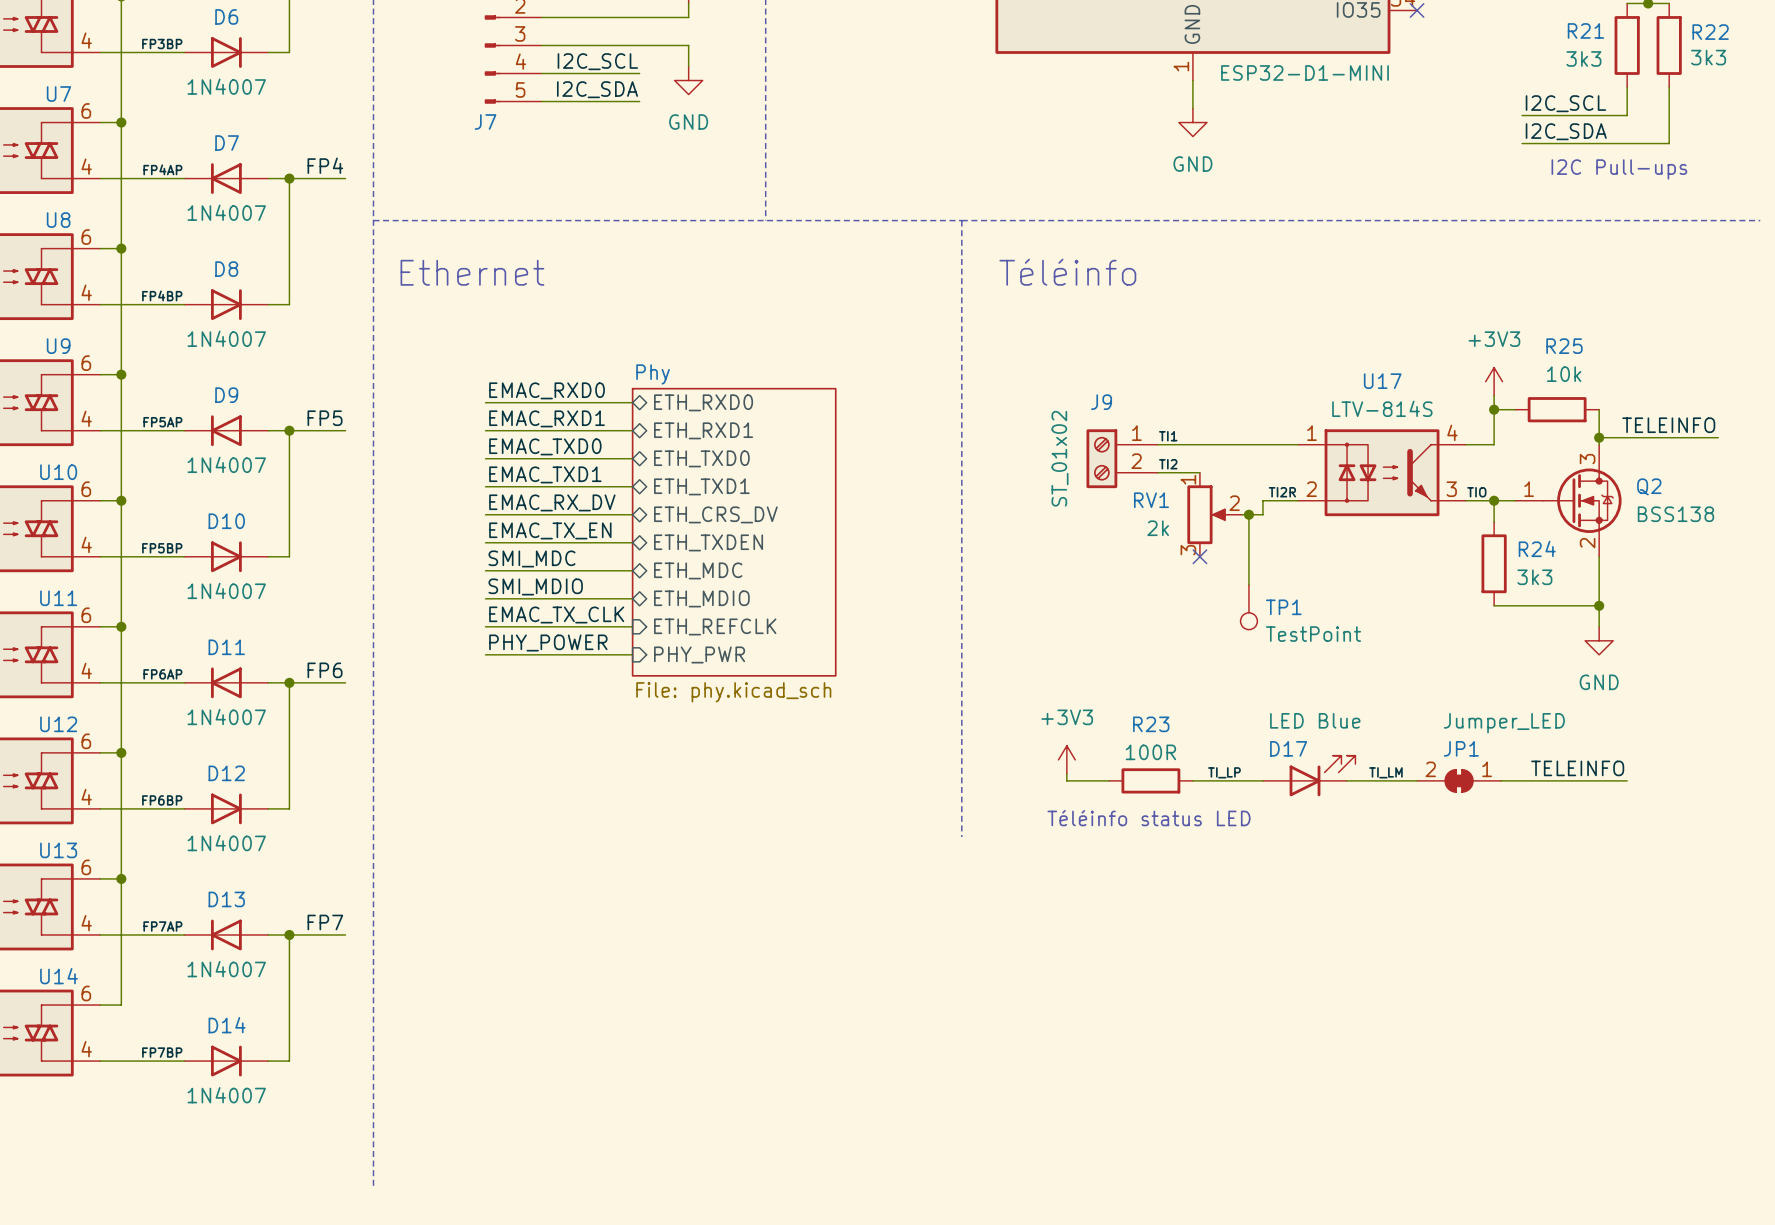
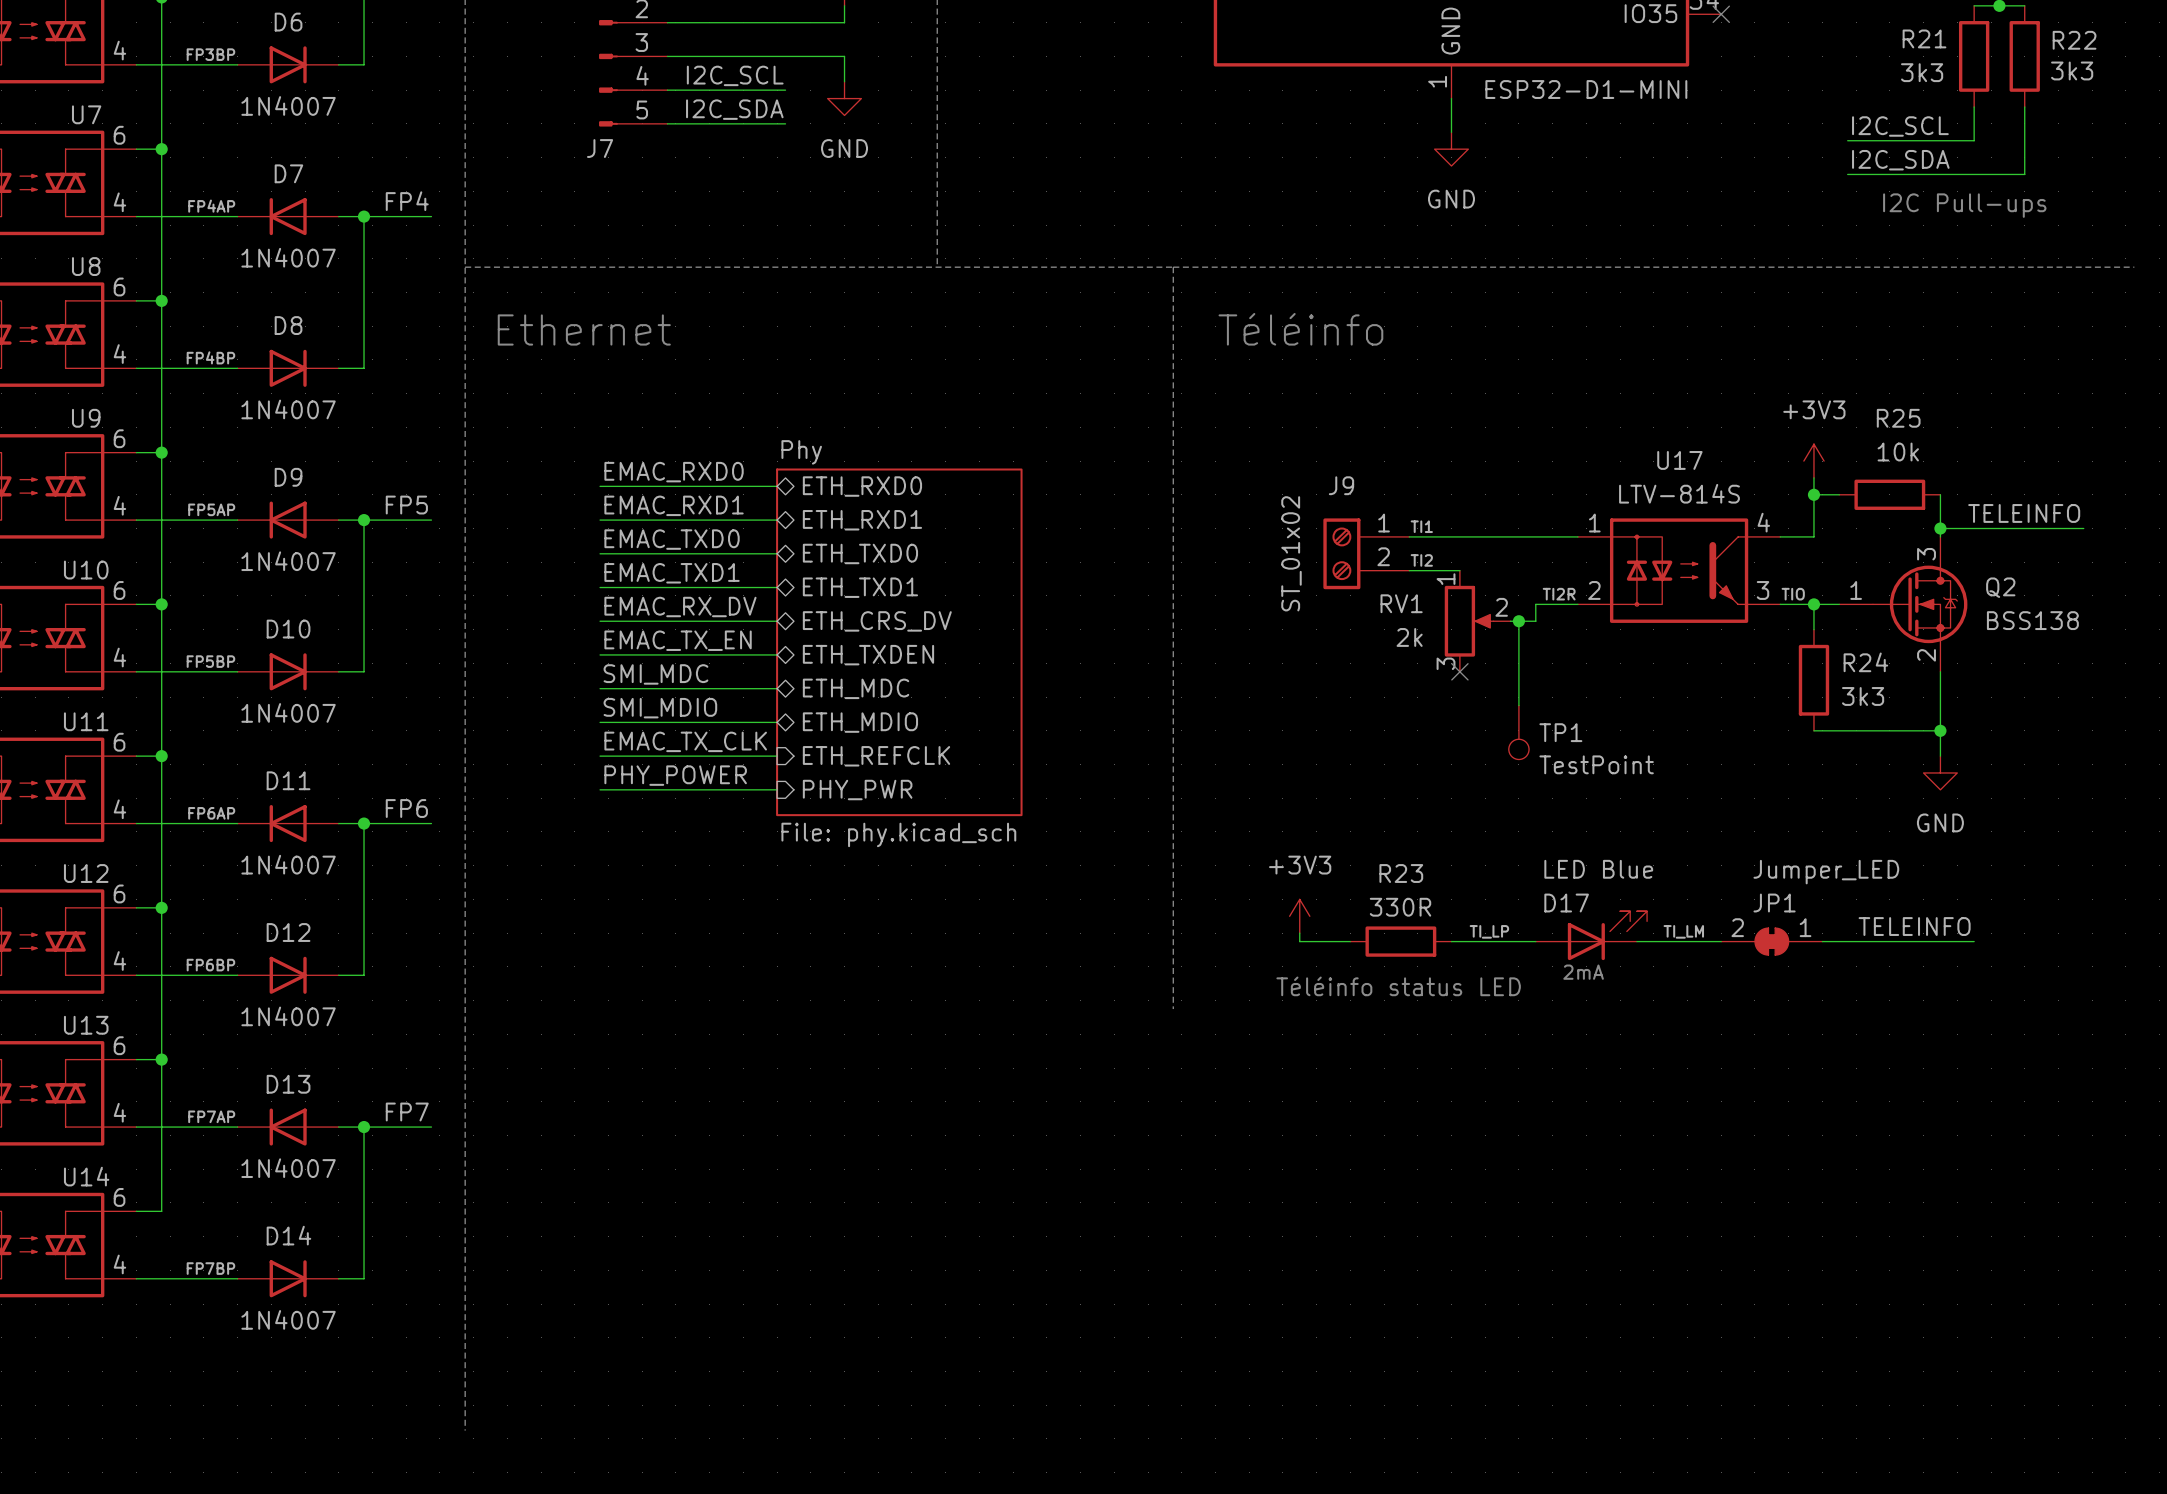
R23 value: 100R (1150, 752) -> 330R (1400, 907)
text: none -> 2mA (1583, 972)

